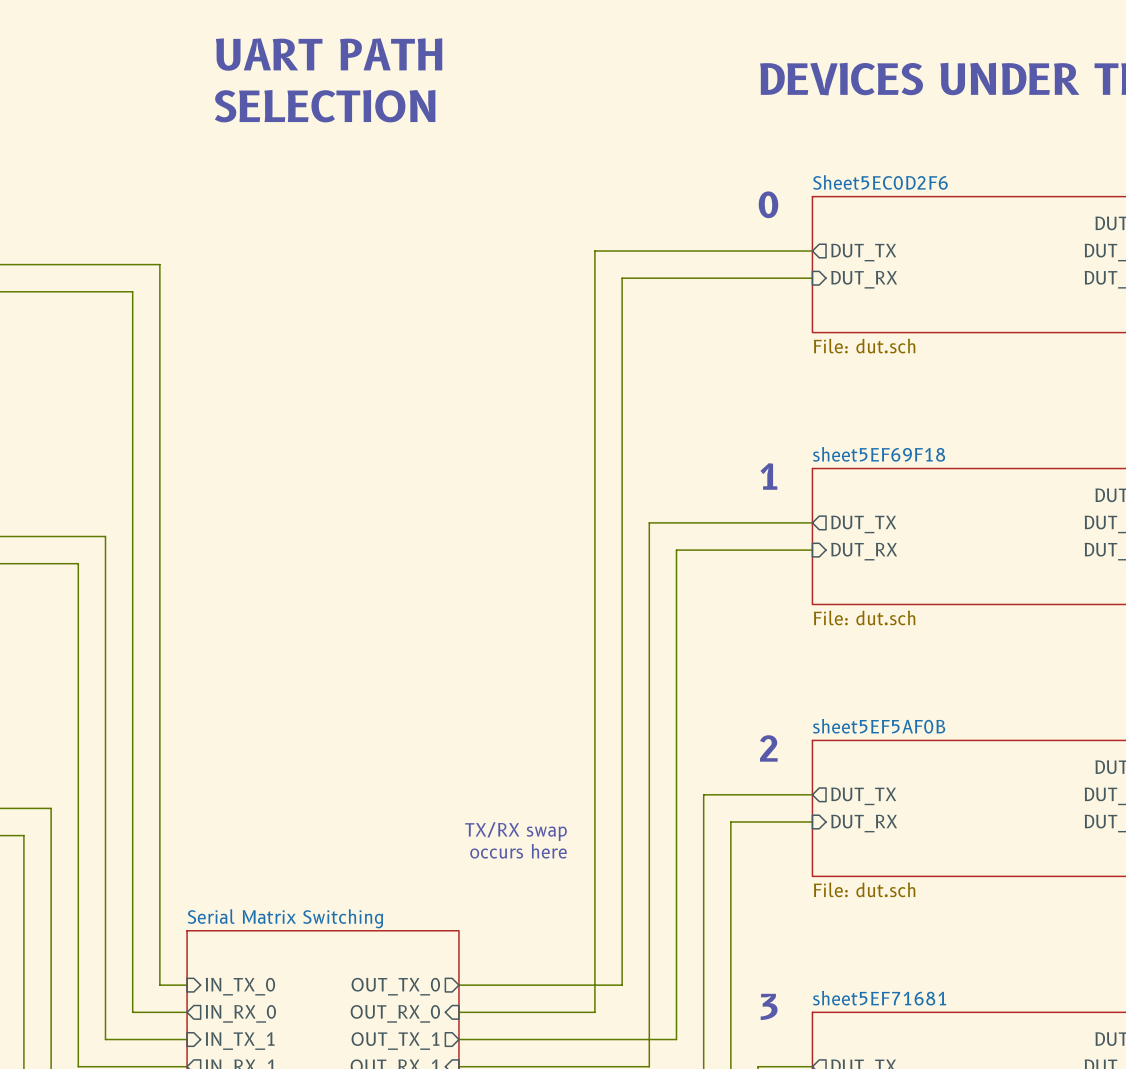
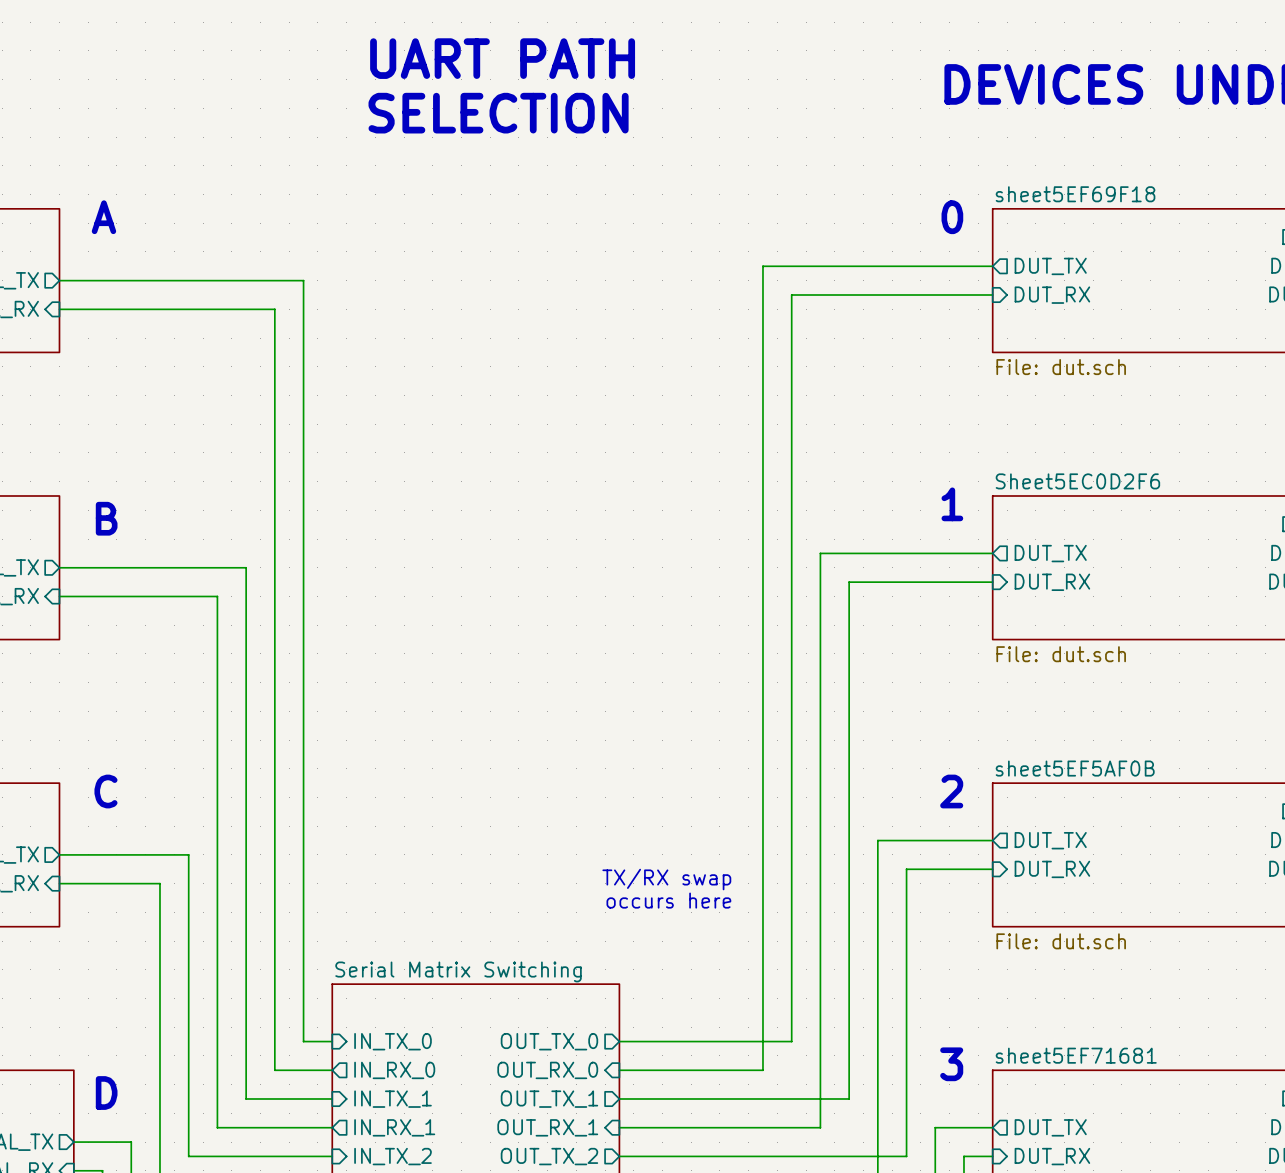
sheet Sheet5EC0D2F6 name: Sheet5EC0D2F6 (880, 182) -> sheet5EF69F18 (1075, 194)
sheet sheet5EF69F18 name: sheet5EF69F18 (879, 454) -> Sheet5EC0D2F6 (1077, 481)

